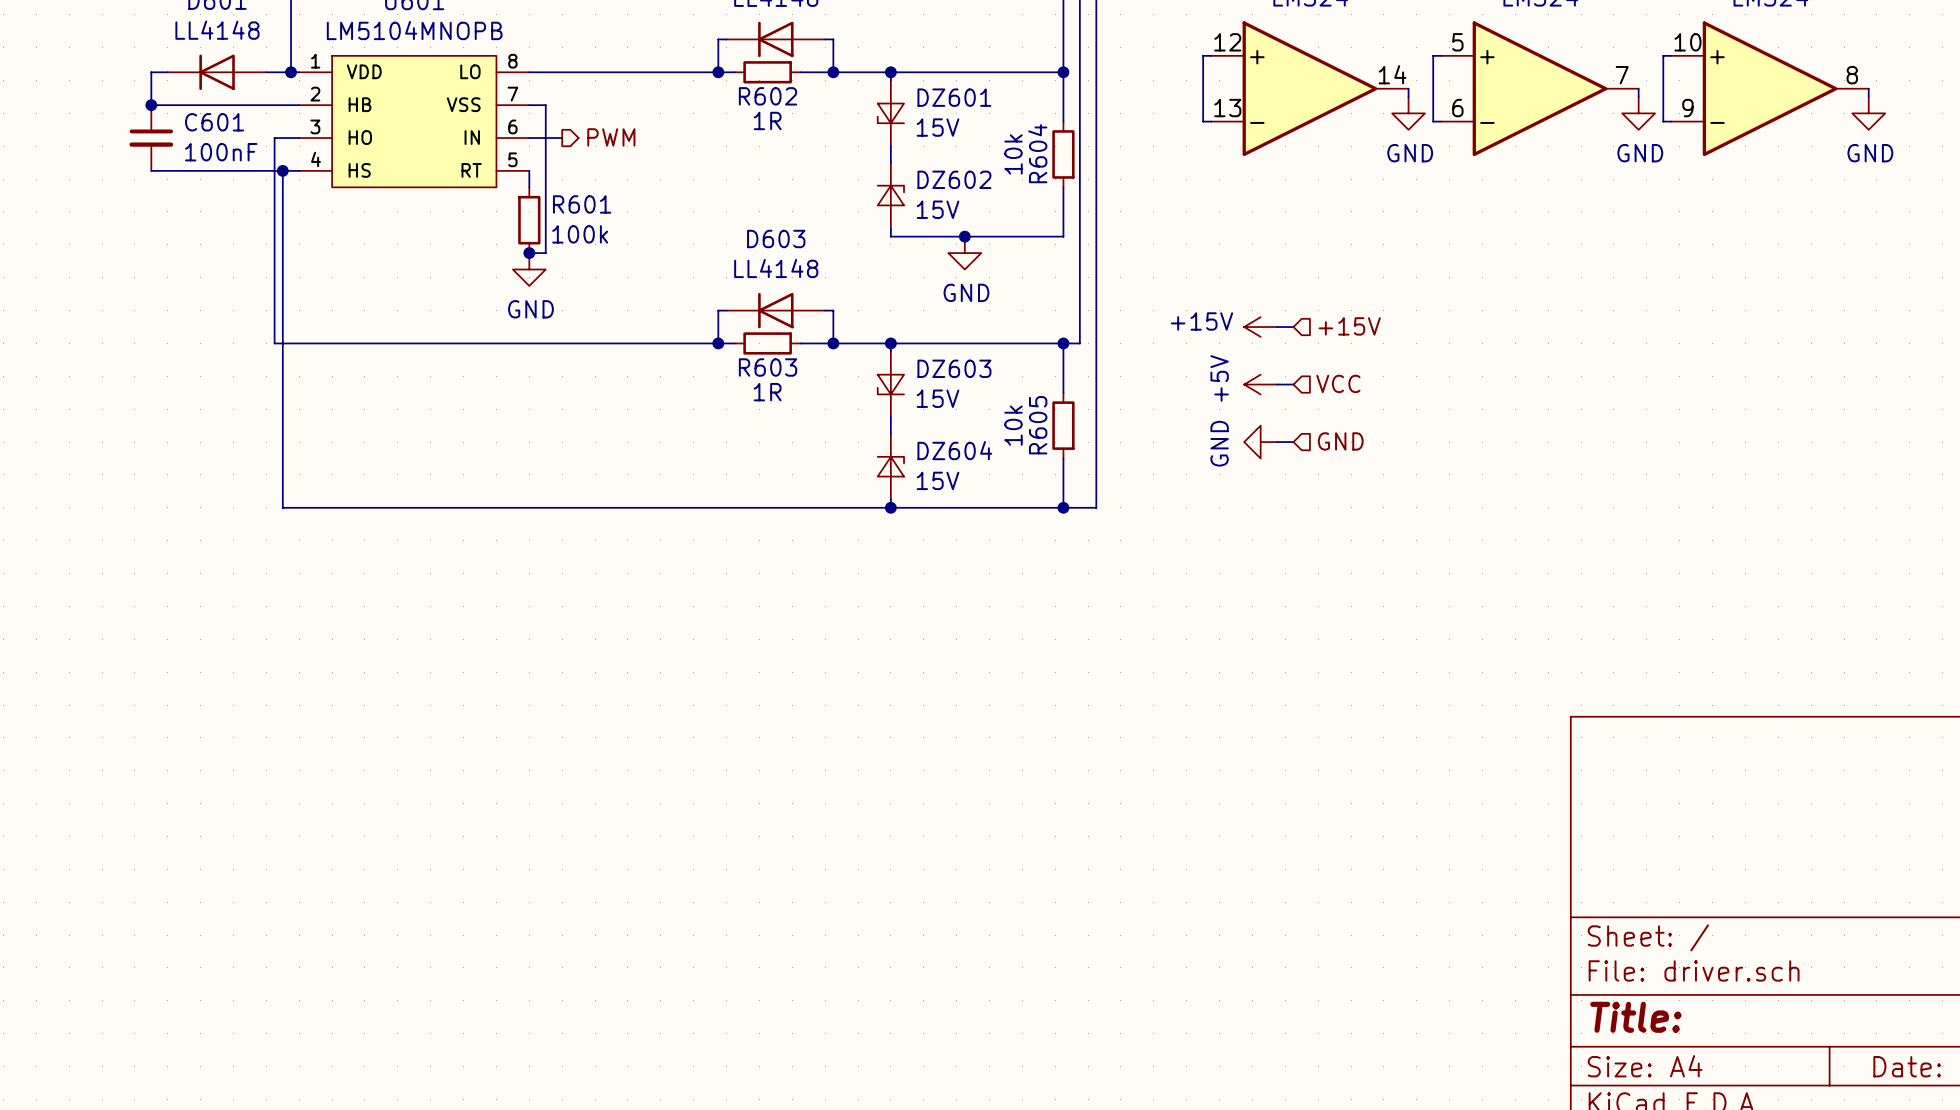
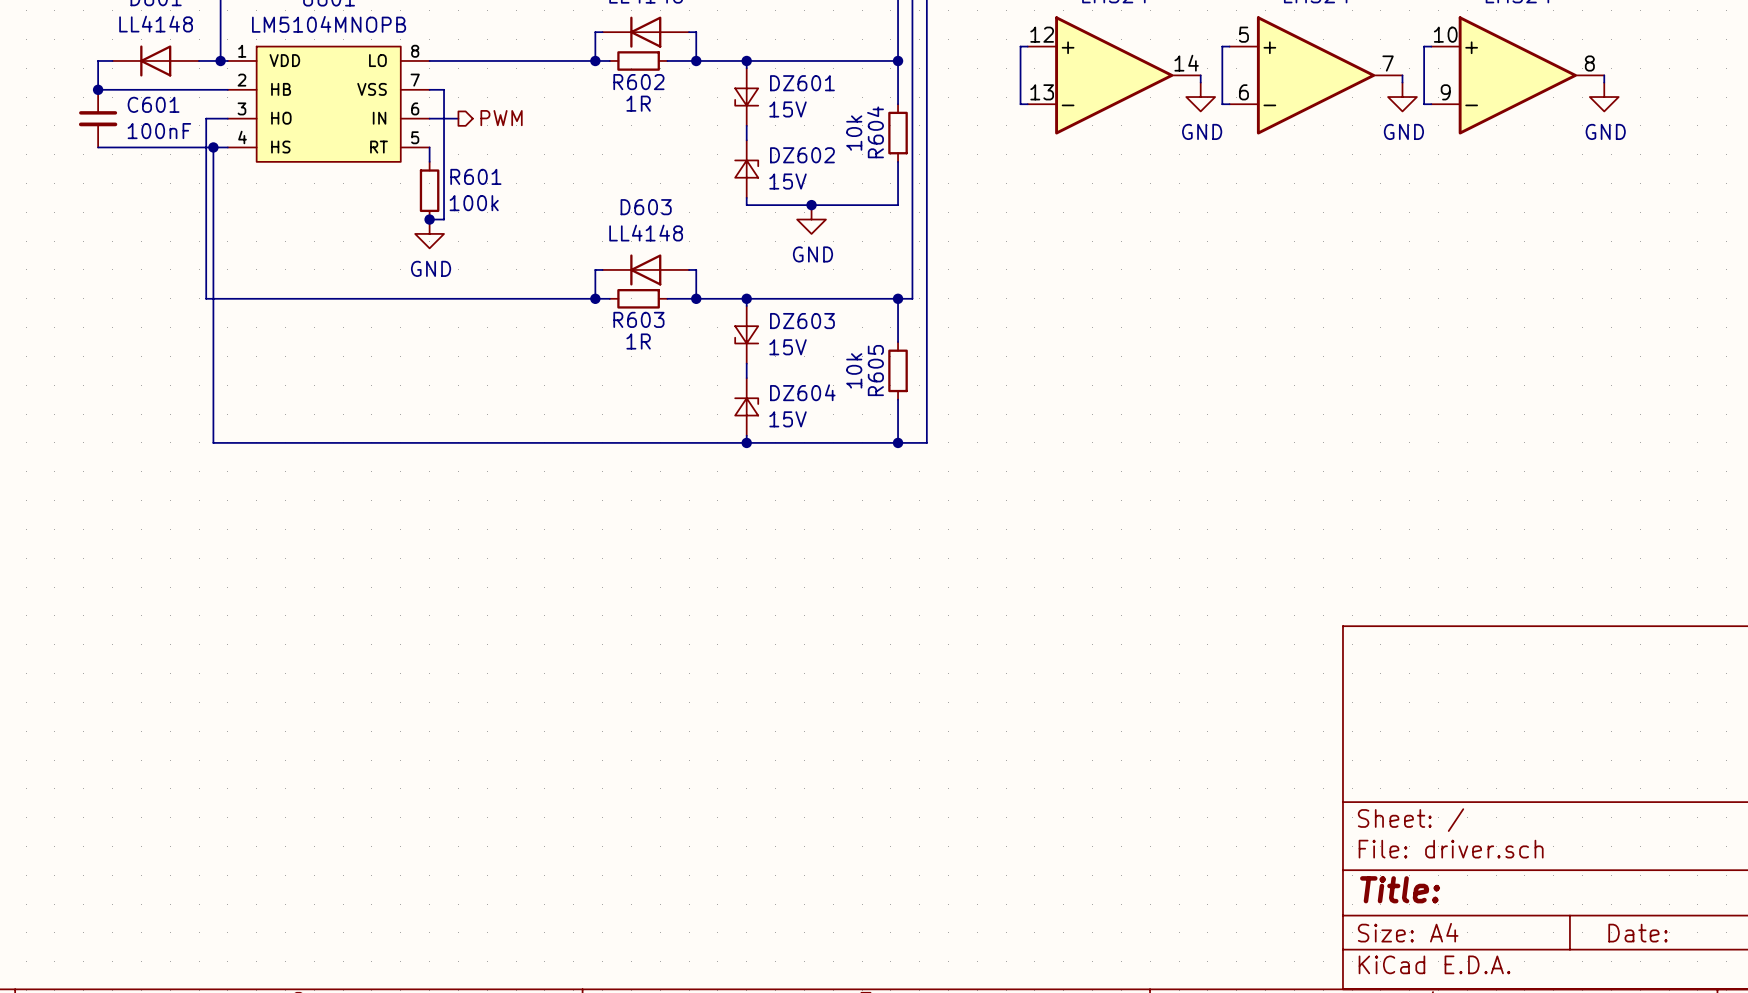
hierarchical label: +15V (1349, 326) -> none
power symbol: +15V (1260, 327) -> none
wire: (1277, 327) (1293, 327) -> none
hierarchical label: VCC (1338, 383) -> none
power symbol: +5V (1260, 384) -> none
wire: (1277, 384) (1293, 384) -> none
hierarchical label: GND (1340, 441) -> none
power symbol: GND (1260, 442) -> none
wire: (1277, 442) (1293, 442) -> none

